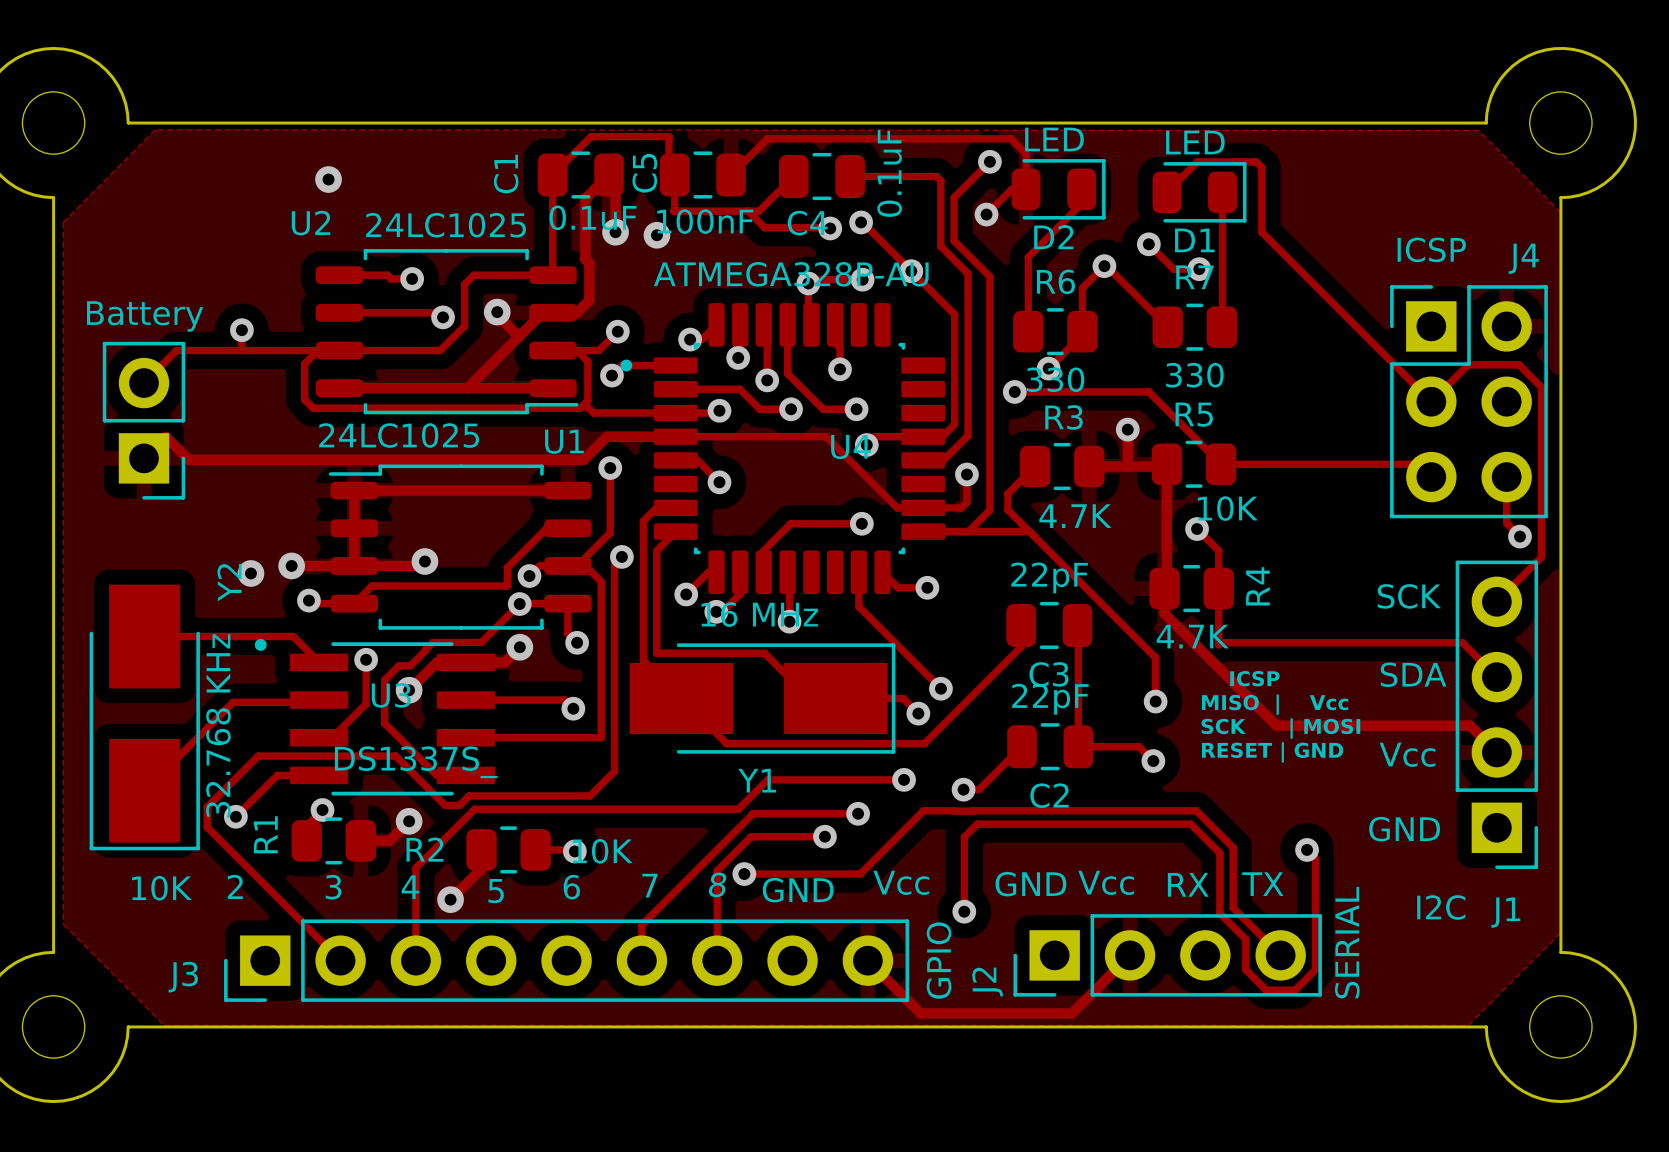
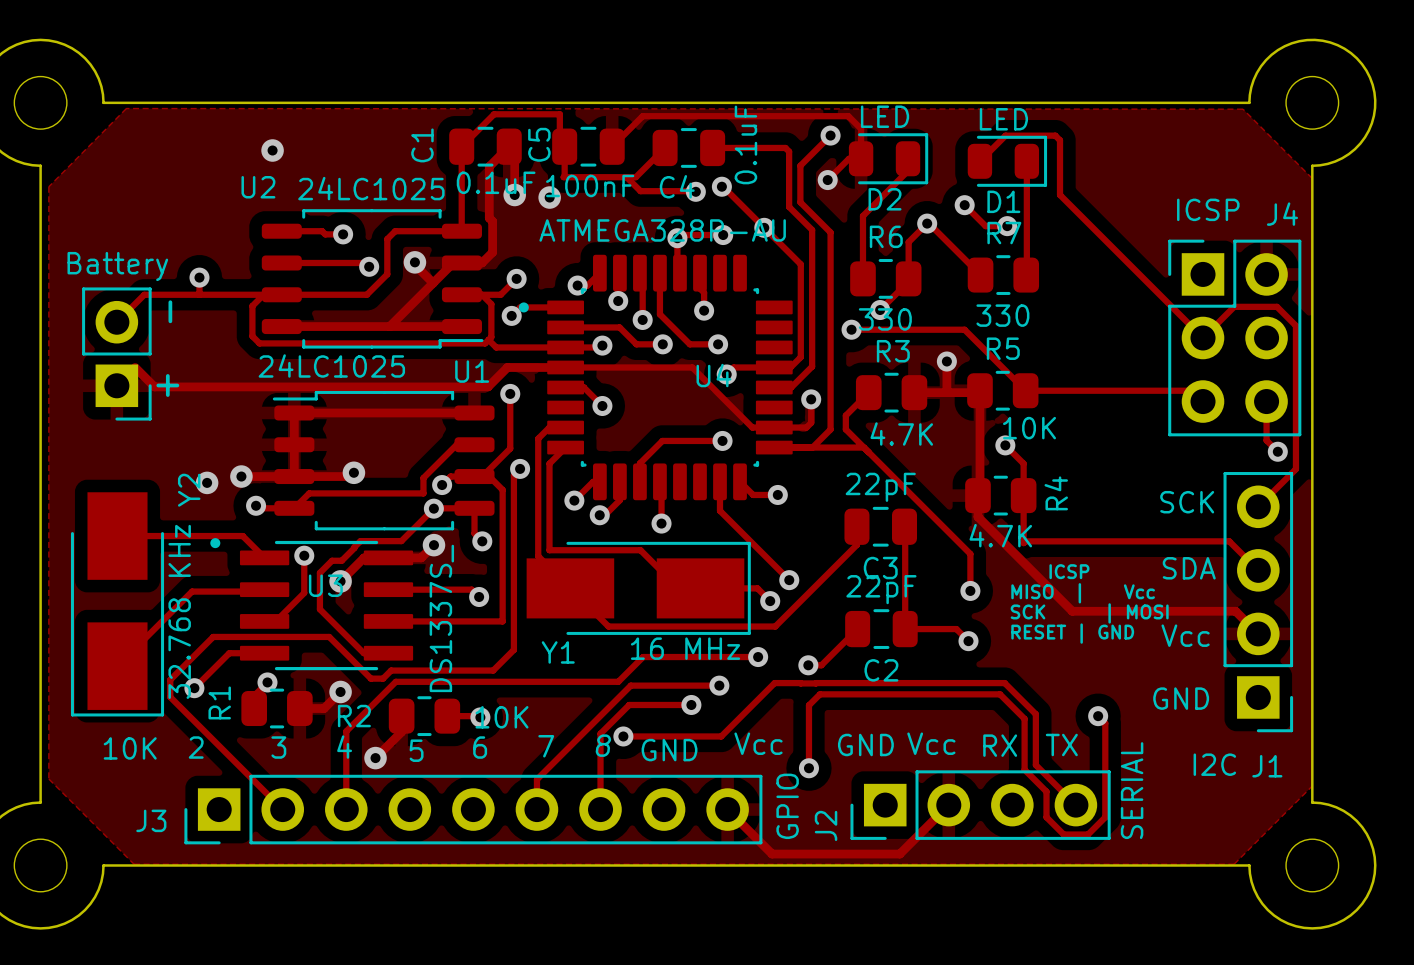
text: none -> - (170, 311)
text: none -> + (167, 385)
Y1 value position: 16 MHz (759, 614) -> 16 MHz (685, 648)
U3 value rotation: 0° (416, 762) -> 90° counterclockwise (441, 618)
Y1 name position: Y1 (757, 780) -> Y1 (558, 652)

